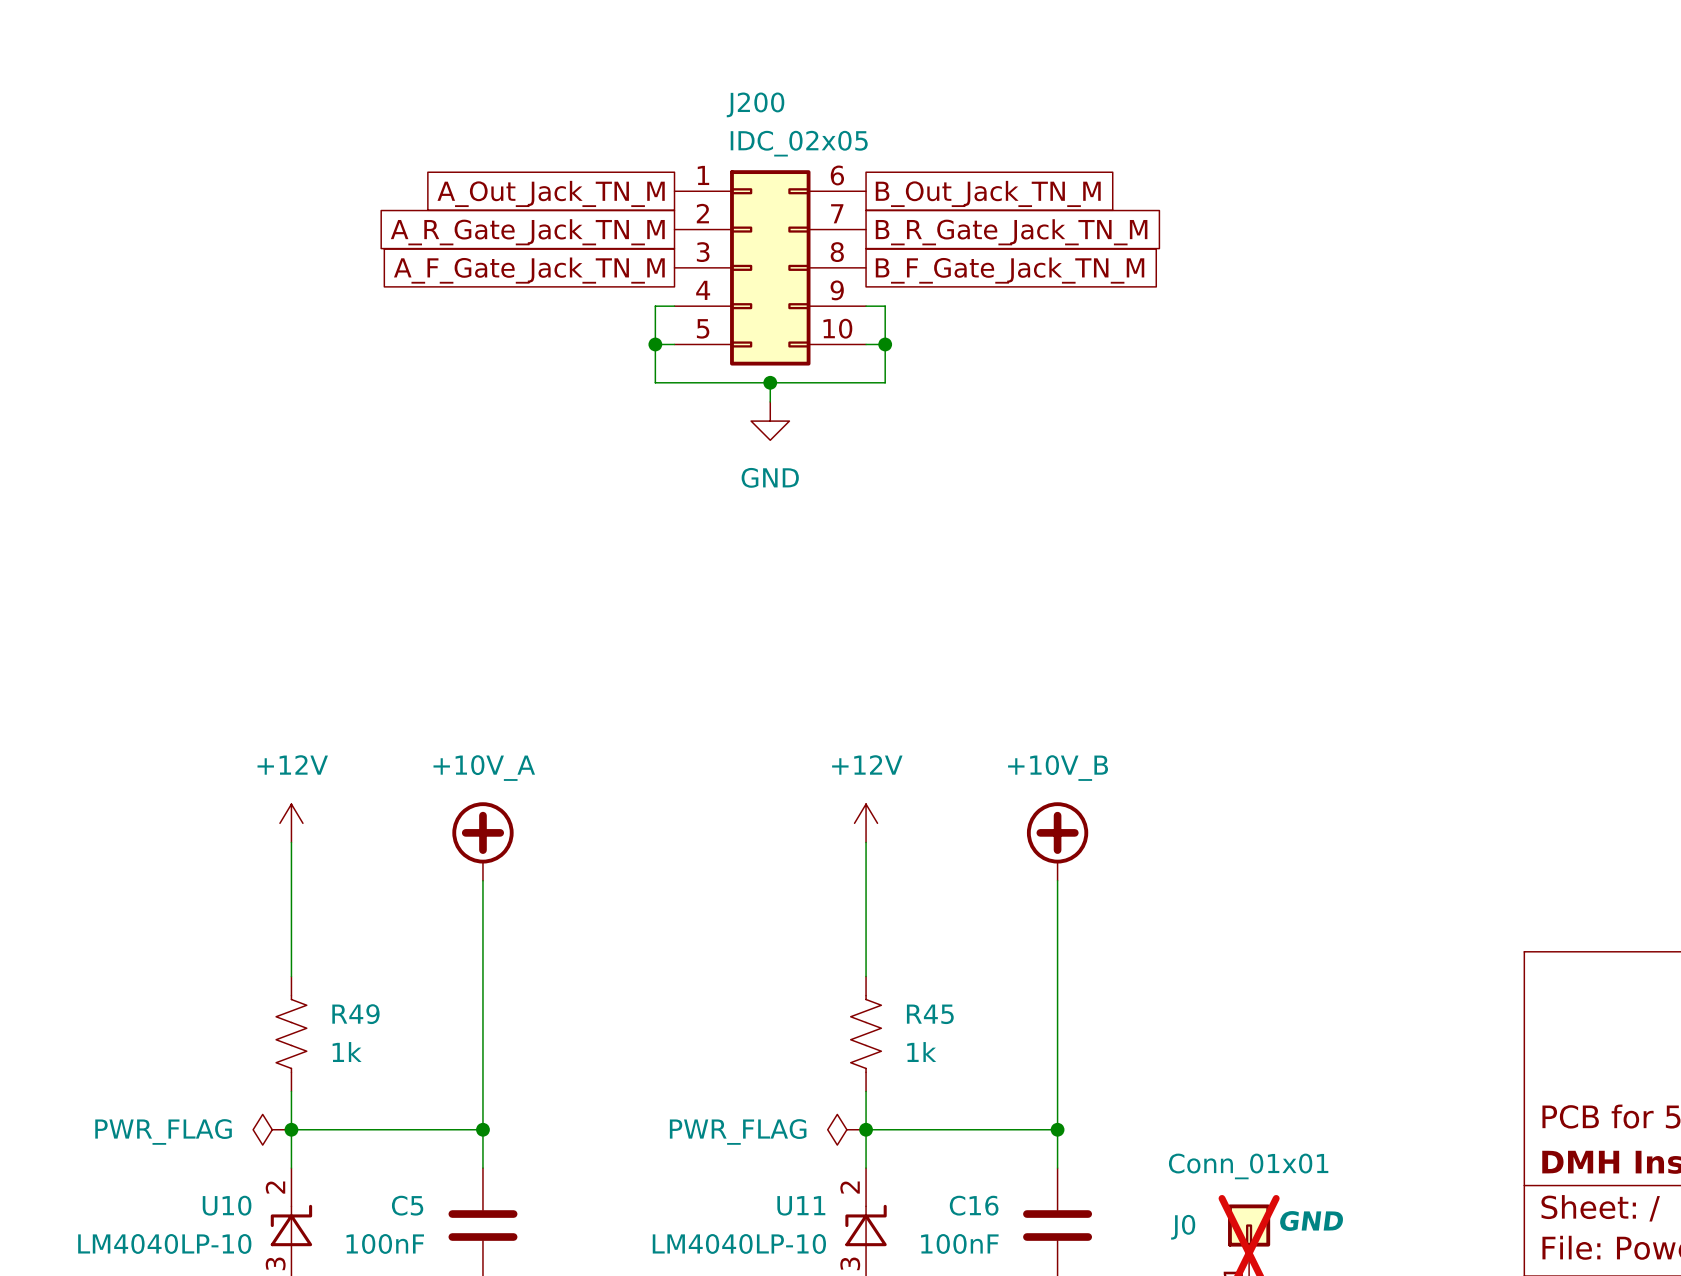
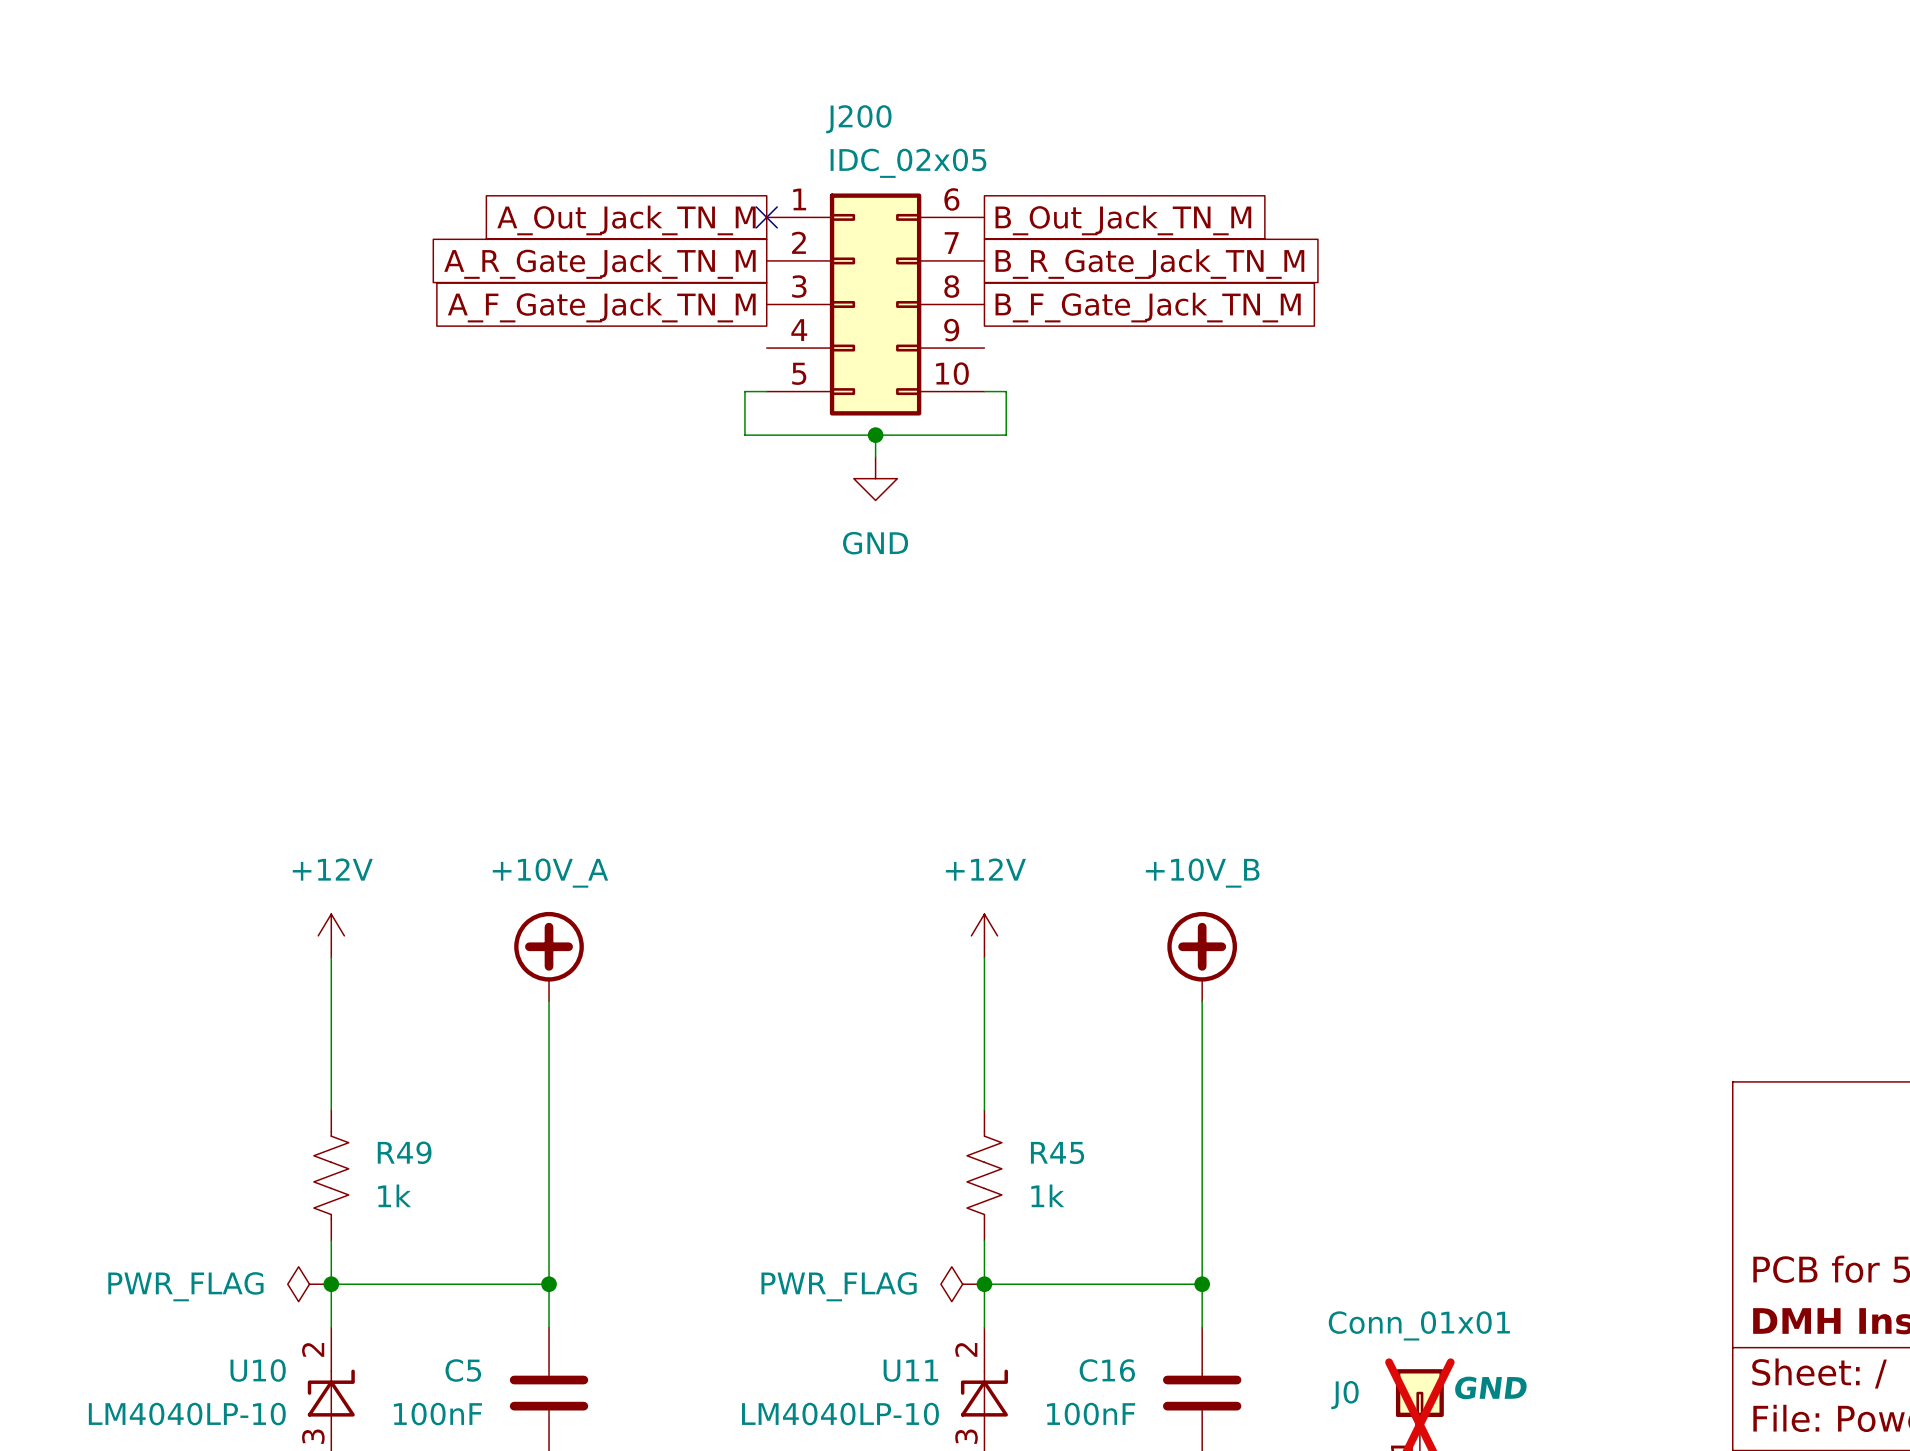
no-connect mark: none -> (766, 217)
wire: (674, 306) (655, 306) (655, 344) -> none
wire: (866, 306) (885, 306) (885, 344) -> none
junction: (655, 344) -> none
junction: (885, 344) -> none

